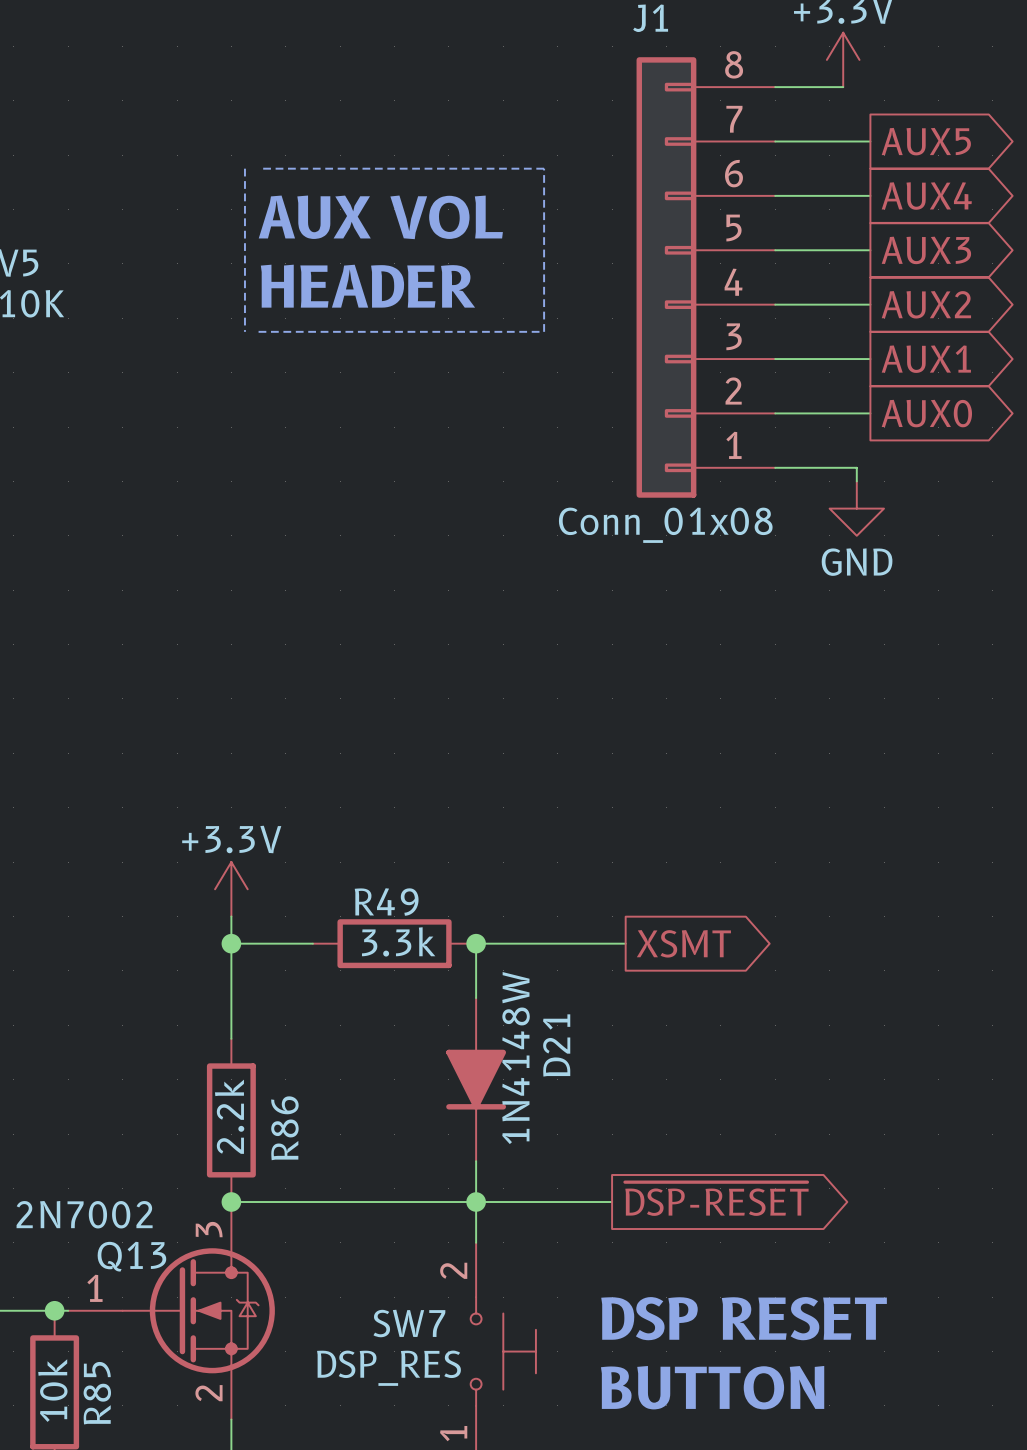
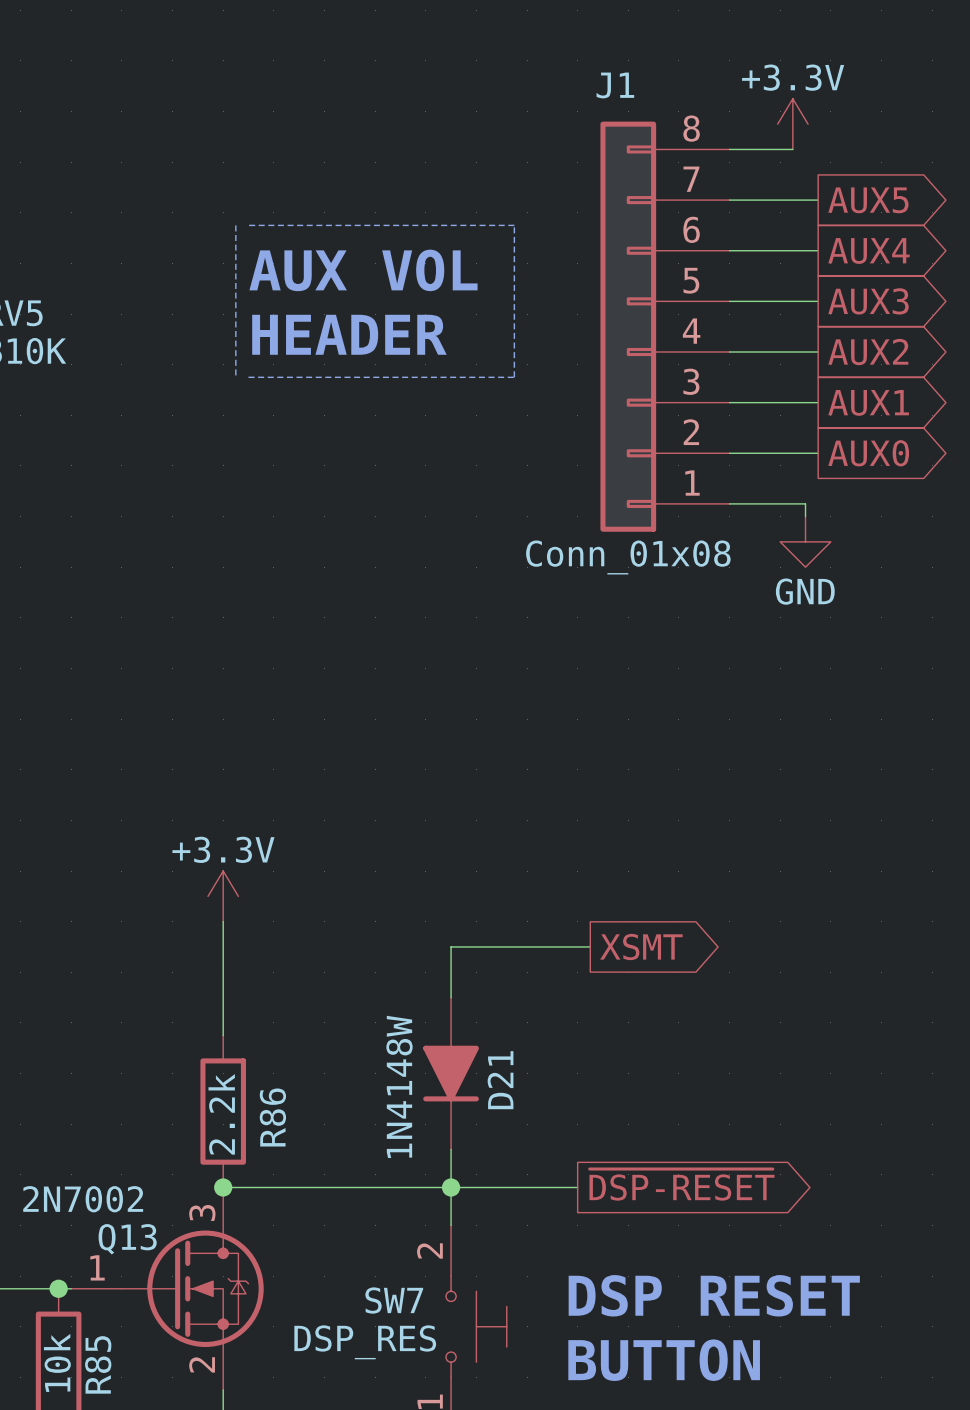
wire: (231, 943) (312, 943) -> none
junction: (231, 943) -> none
R49: 3.3k (394, 943) -> none
junction: (476, 943) -> none
D21 name position: D21 (556, 1045) -> D21 (500, 1080)
D21 value position: 1N4148W (516, 1058) -> 1N4148W (399, 1086)

